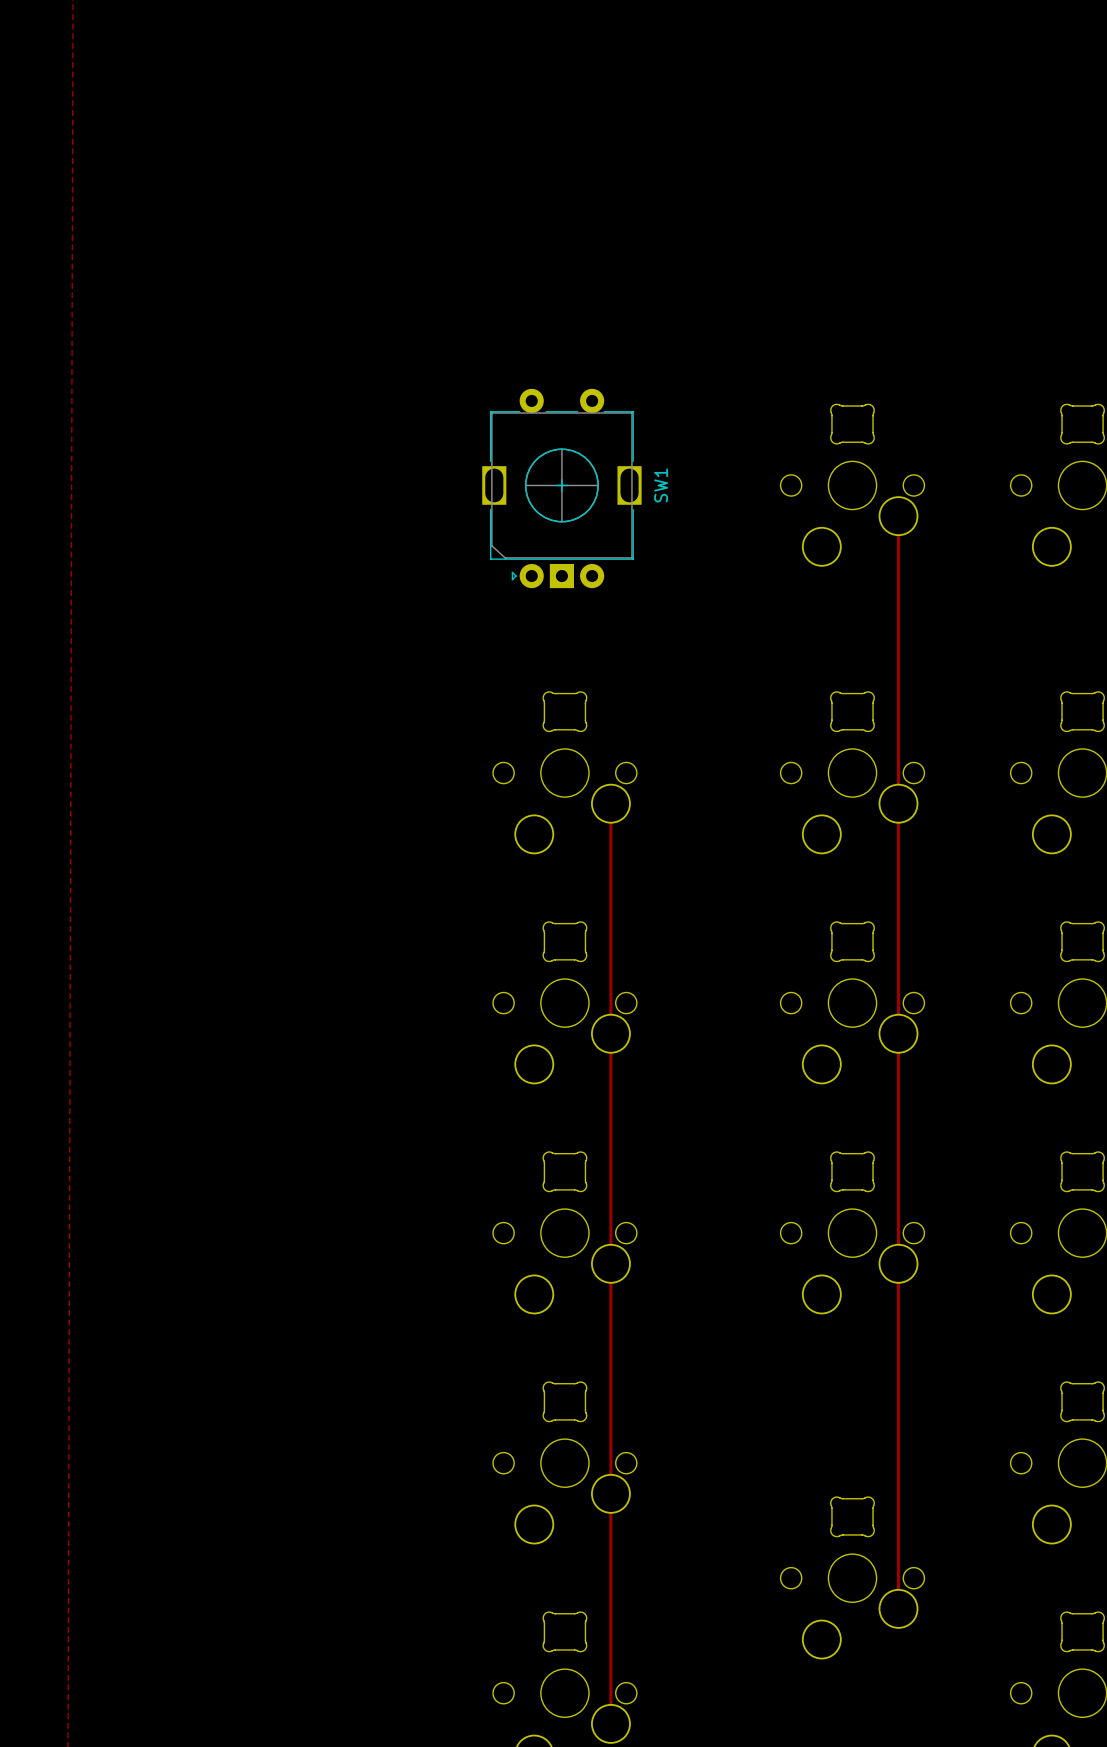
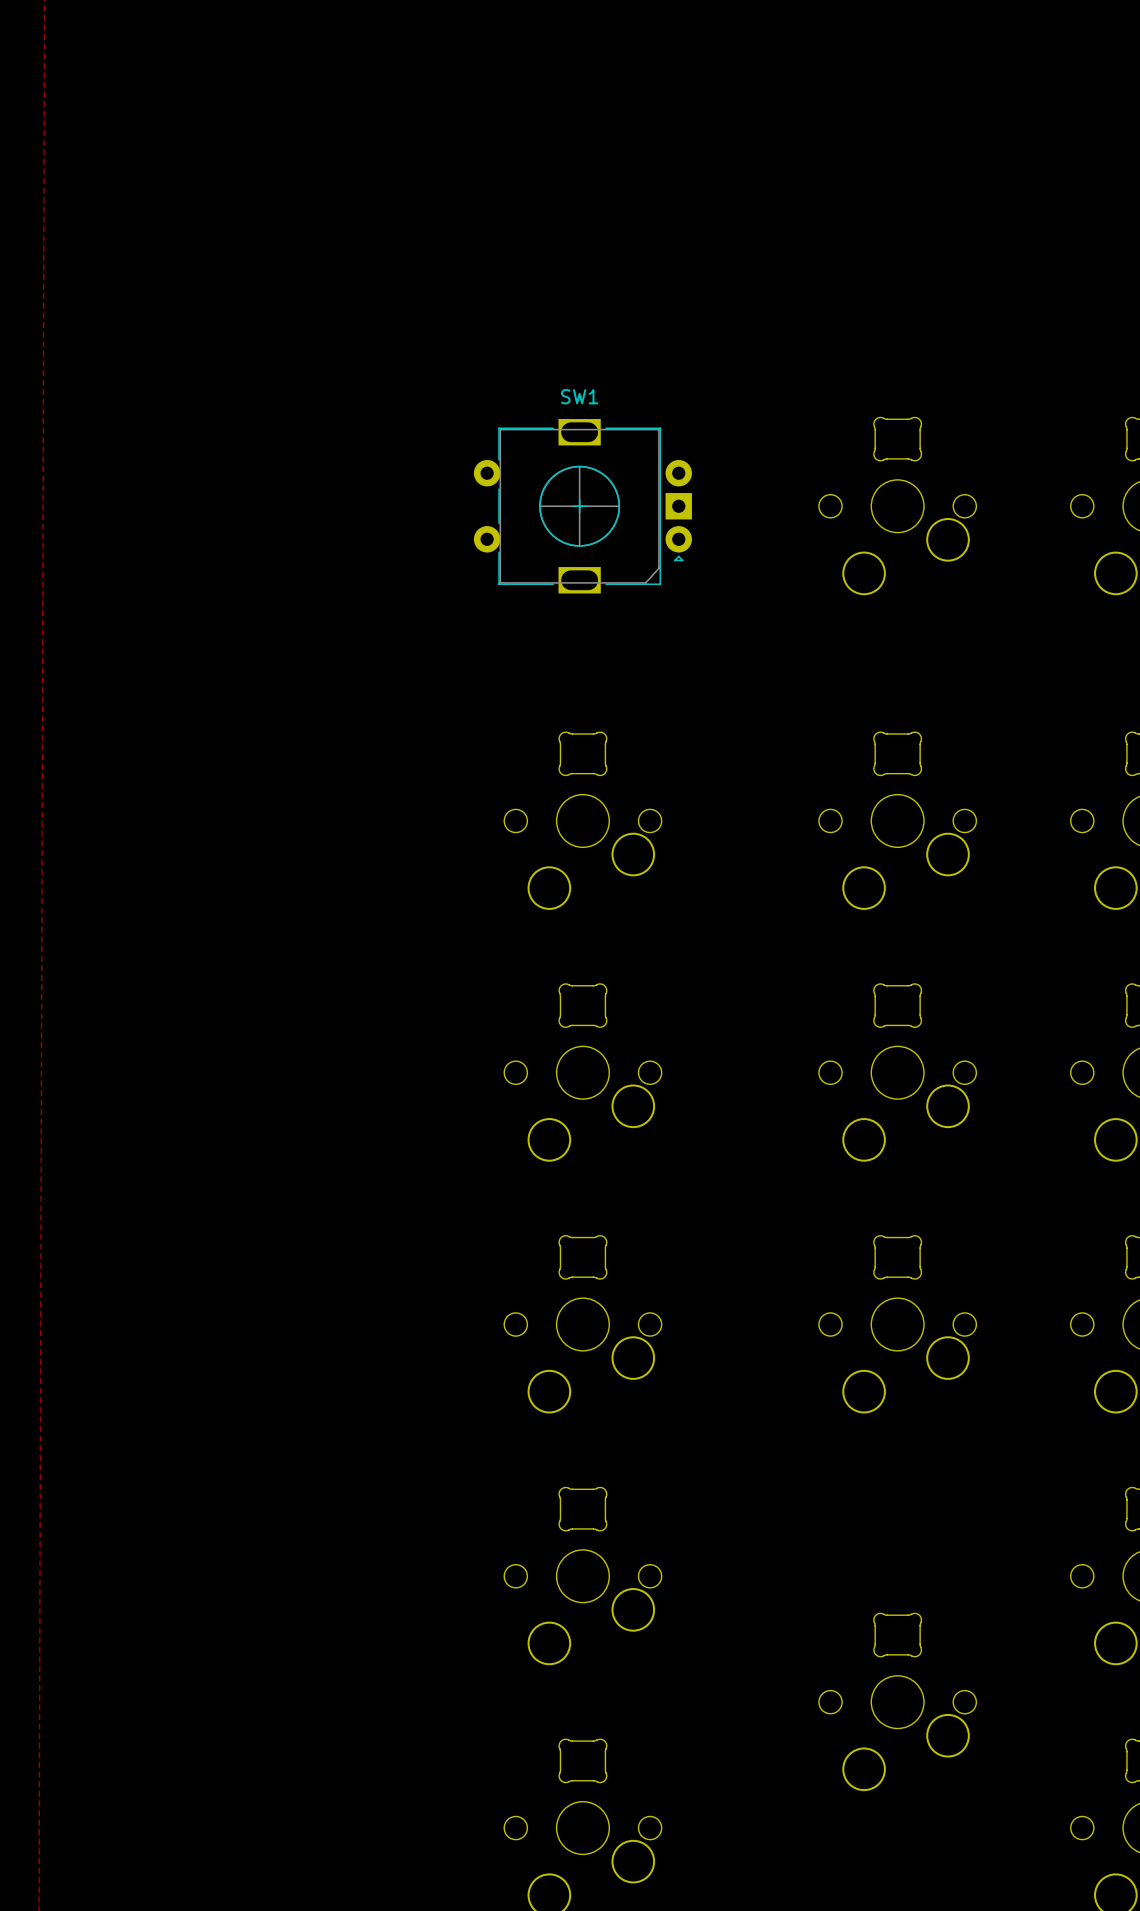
SW1 rotation: 0° (561, 488) -> 90° counterclockwise (582, 506)
track: (898, 516) (898, 1608) -> none
track: (610, 803) (610, 1723) -> none

